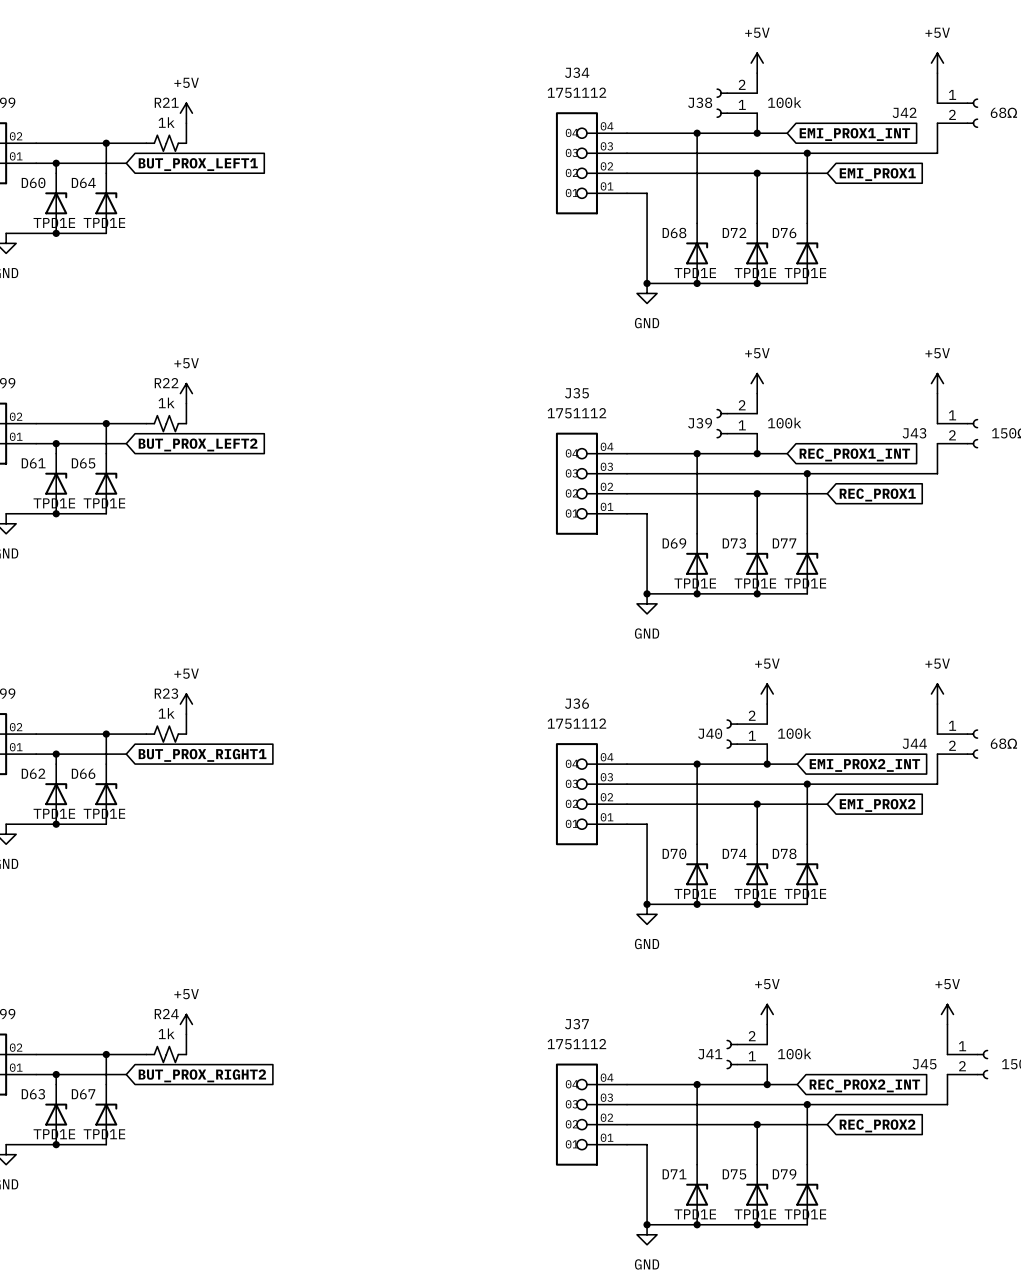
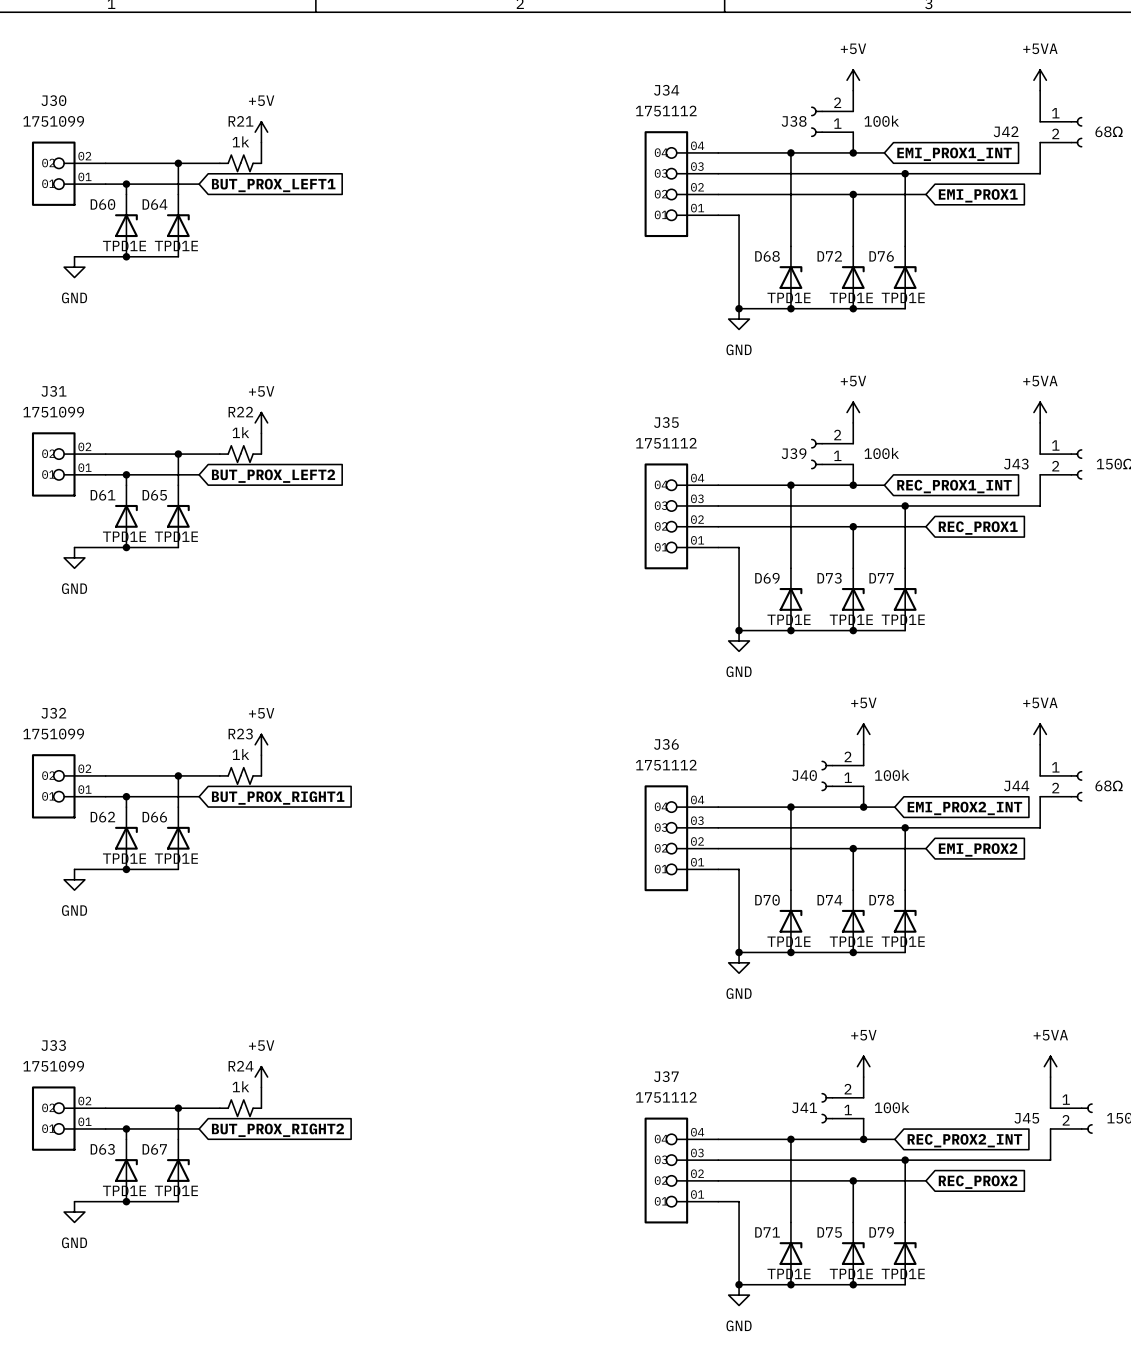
power symbol: +5V (937, 63) -> +5VA (1040, 80)
power symbol: +5V (937, 383) -> +5VA (1040, 412)
power symbol: +5V (937, 694) -> +5VA (1040, 734)
power symbol: +5V (947, 1014) -> +5VA (1050, 1066)

